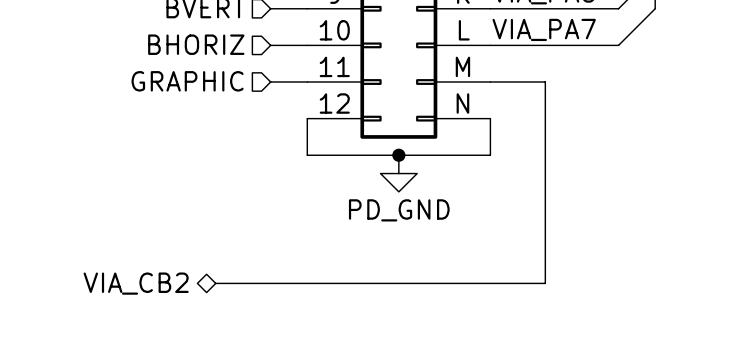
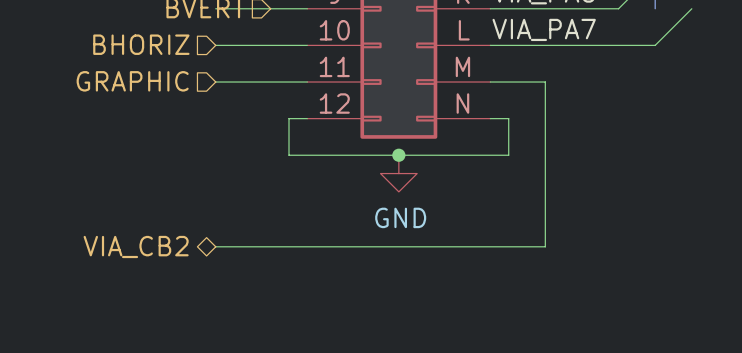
wire: none -> (215, 8) (270, 8)
wire: (655, 8) (618, 45) -> (691, 8) (655, 45) (618, 45)
hierarchical label position: BHORIZ (196, 44) -> BHORIZ (141, 44)
wire: none -> (215, 45) (270, 45)
hierarchical label position: GRAPHIC (187, 81) -> GRAPHIC (132, 81)
wire: none -> (215, 82) (270, 82)
wire: (307, 118) (307, 155) -> (307, 118) (289, 118) (289, 155) (307, 155)
wire: (490, 118) (490, 155) -> (490, 118) (508, 118) (508, 155) (490, 155)
power symbol: PD_GND (398, 173) -> GND (398, 173)
wire: (545, 246) (545, 283) (215, 283) -> (545, 246) (215, 246)
hierarchical label position: VIA_CB2 (136, 283) -> VIA_CB2 (136, 246)

